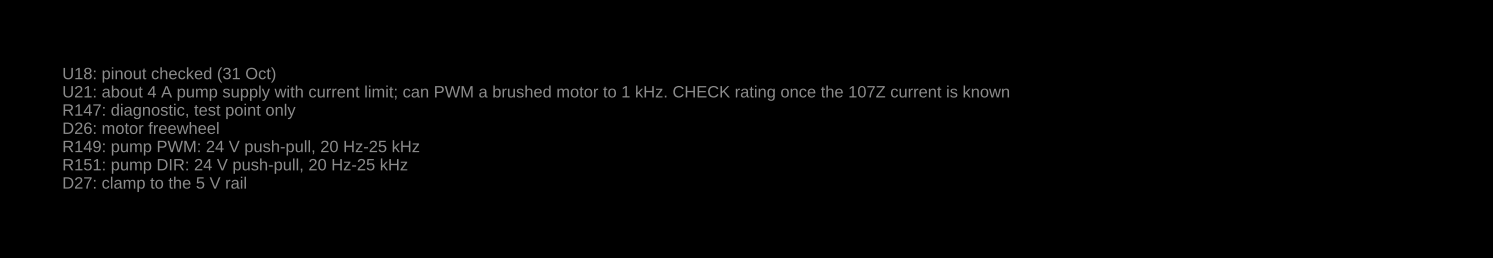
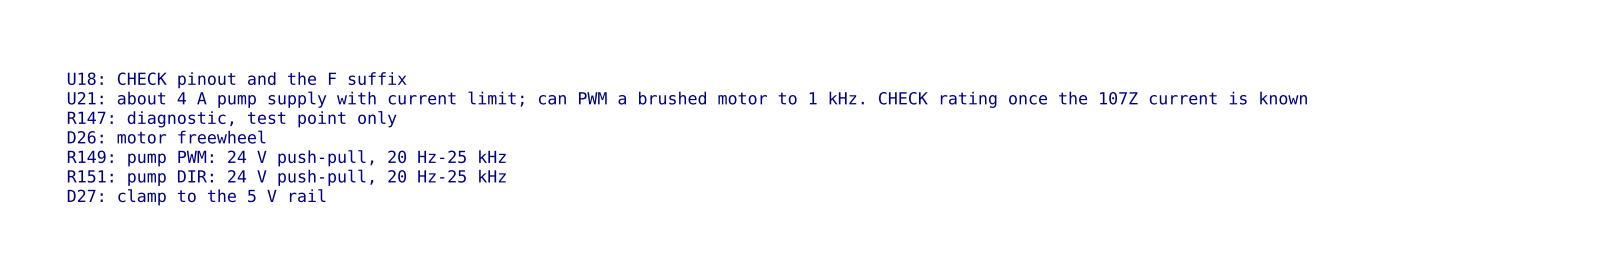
text: U18: pinout checked (31 Oct) (169, 74) -> U18: CHECK pinout and the F suffix (237, 80)

